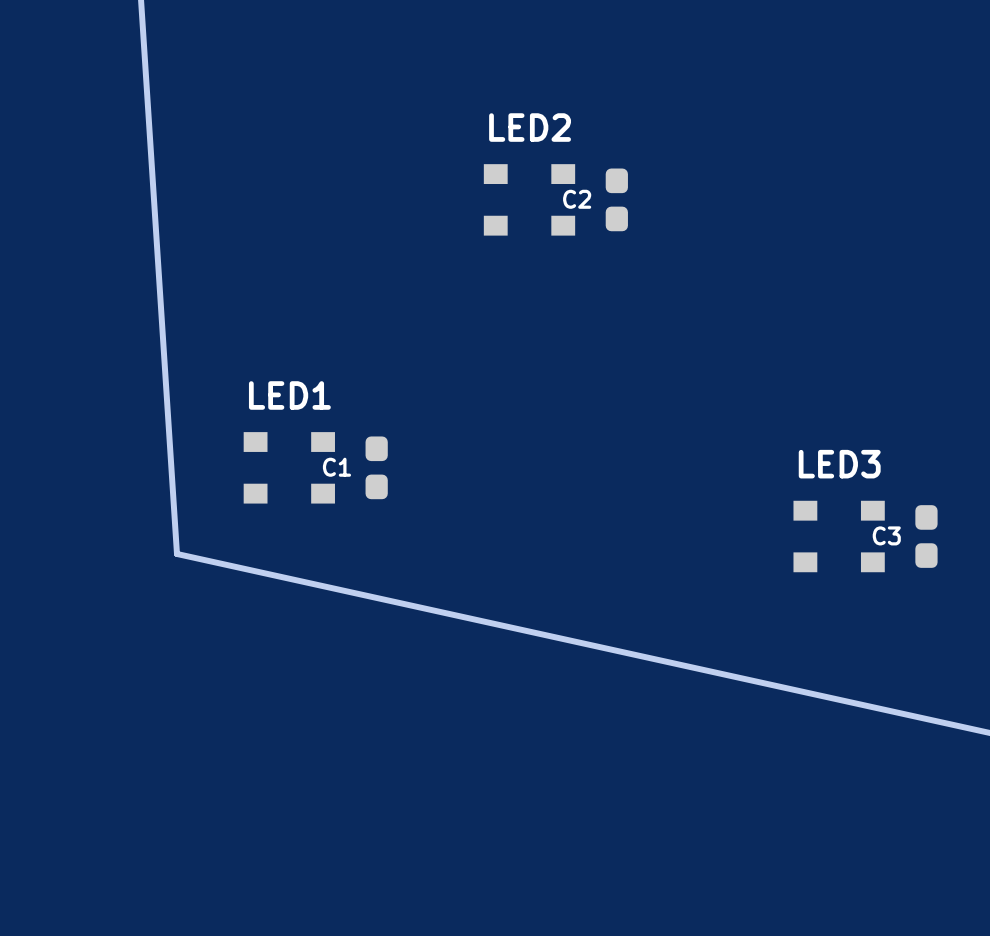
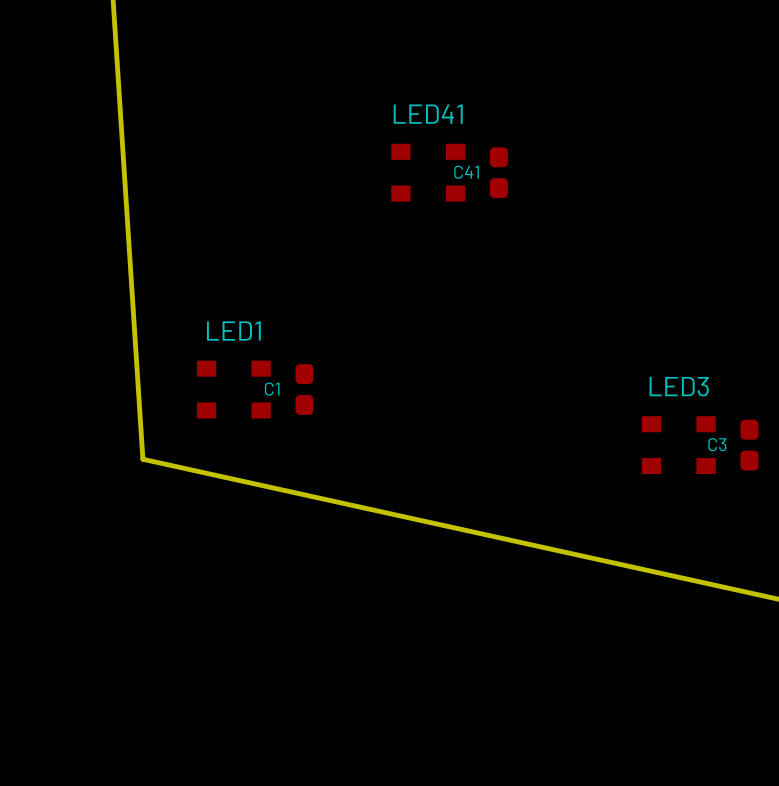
LED2 name: LED2 (530, 127) -> LED41 (428, 114)
C2 name: C2 (577, 199) -> C41 (466, 172)

